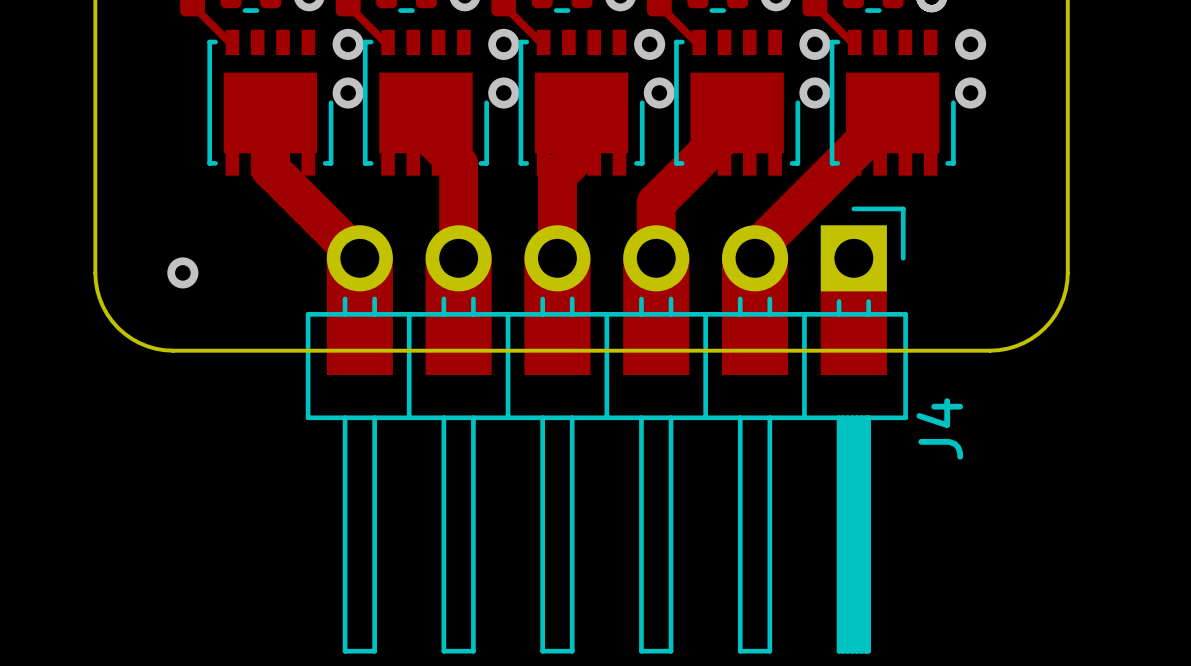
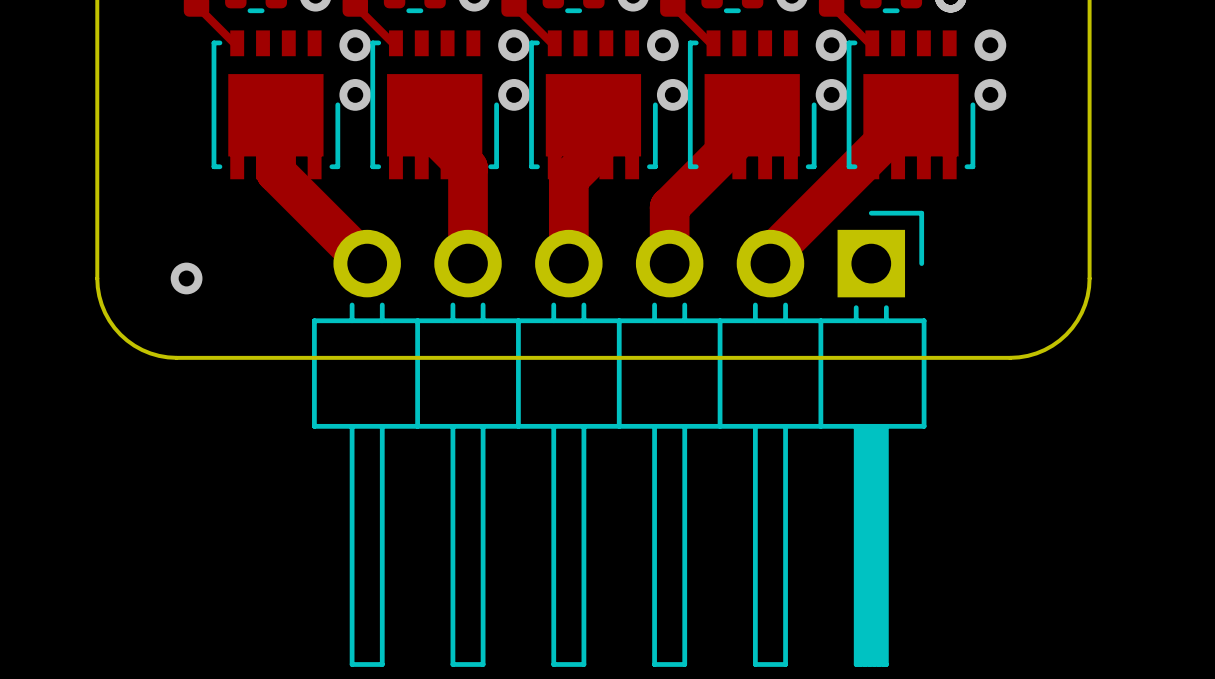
J4: (606, 430) -> none
part: none -> (619, 438)

